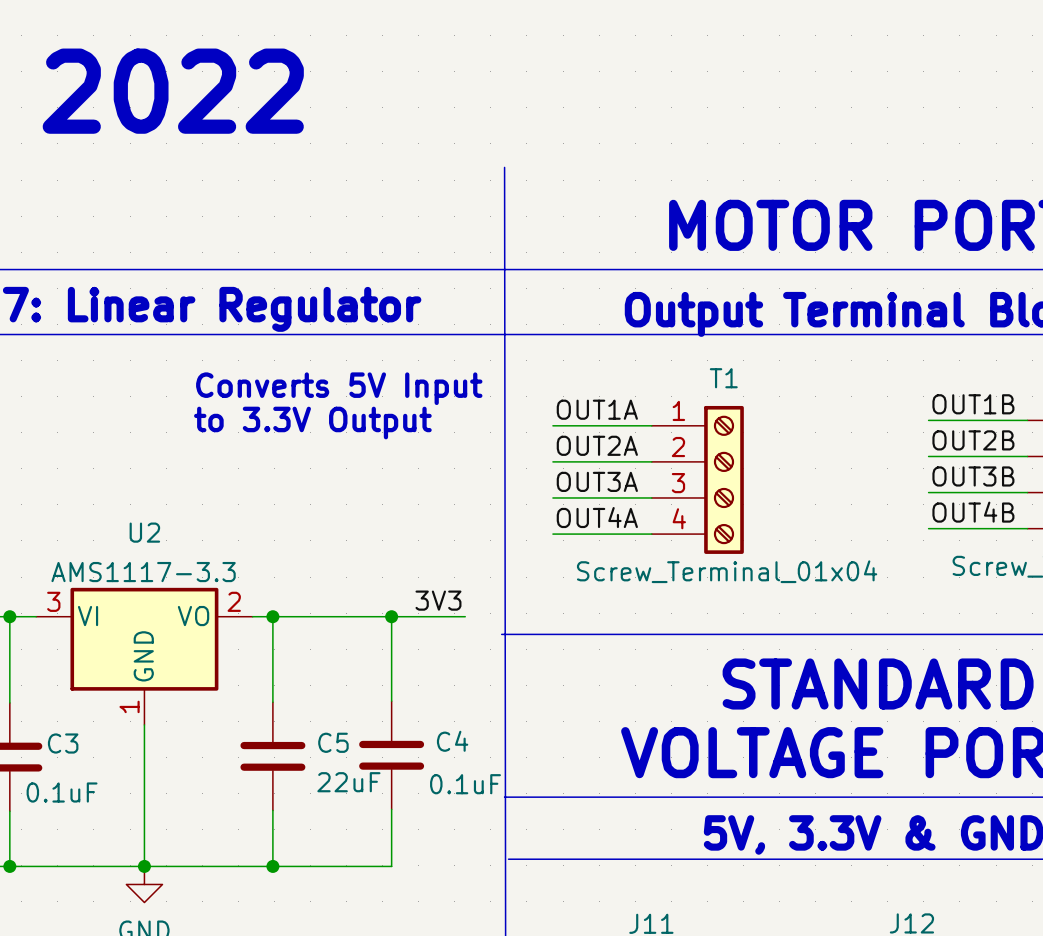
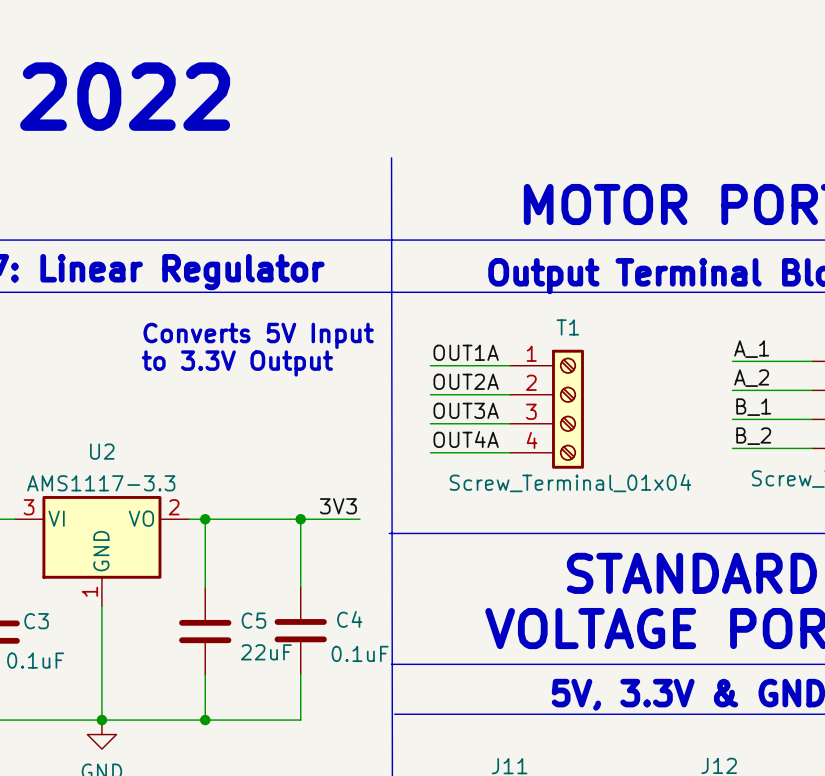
label: OUT1B (973, 404) -> A_1 (751, 349)
label: OUT2B (973, 440) -> A_2 (751, 378)
label: OUT3B (973, 476) -> B_1 (753, 407)
label: OUT4B (973, 512) -> B_2 (753, 436)

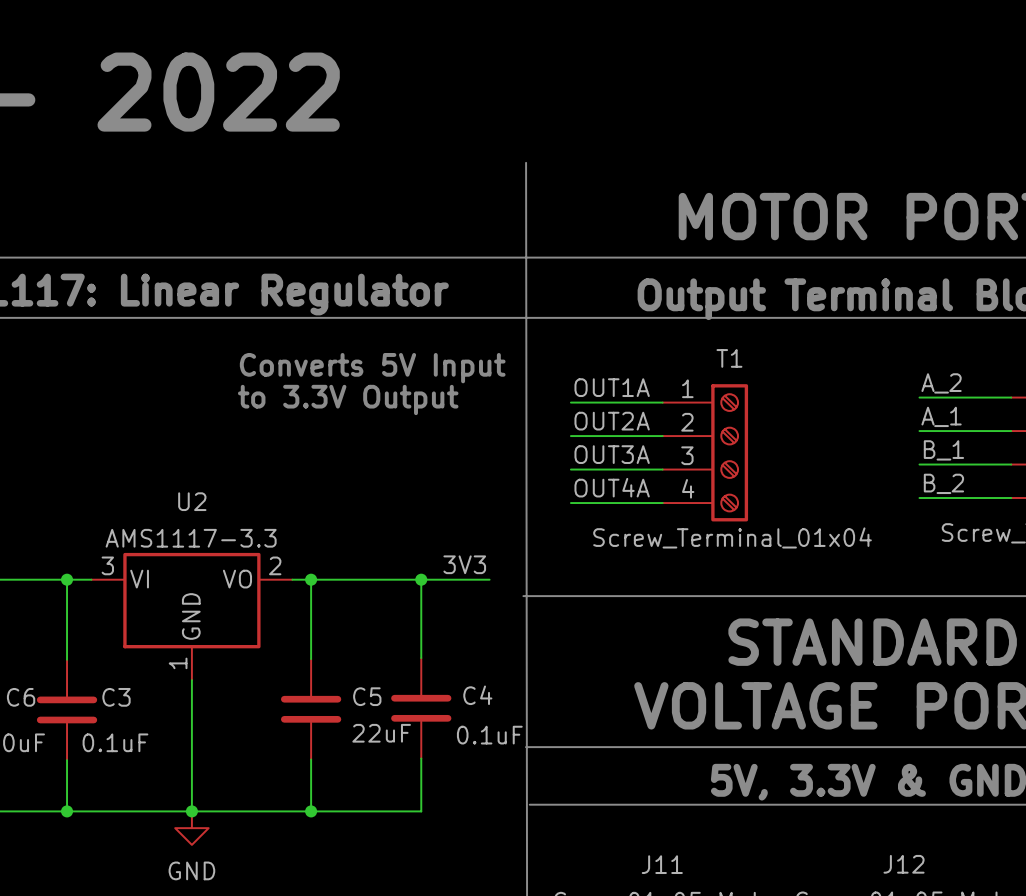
label: A_1 (751, 349) -> A_2 (941, 383)
label: A_2 (751, 378) -> A_1 (941, 416)

